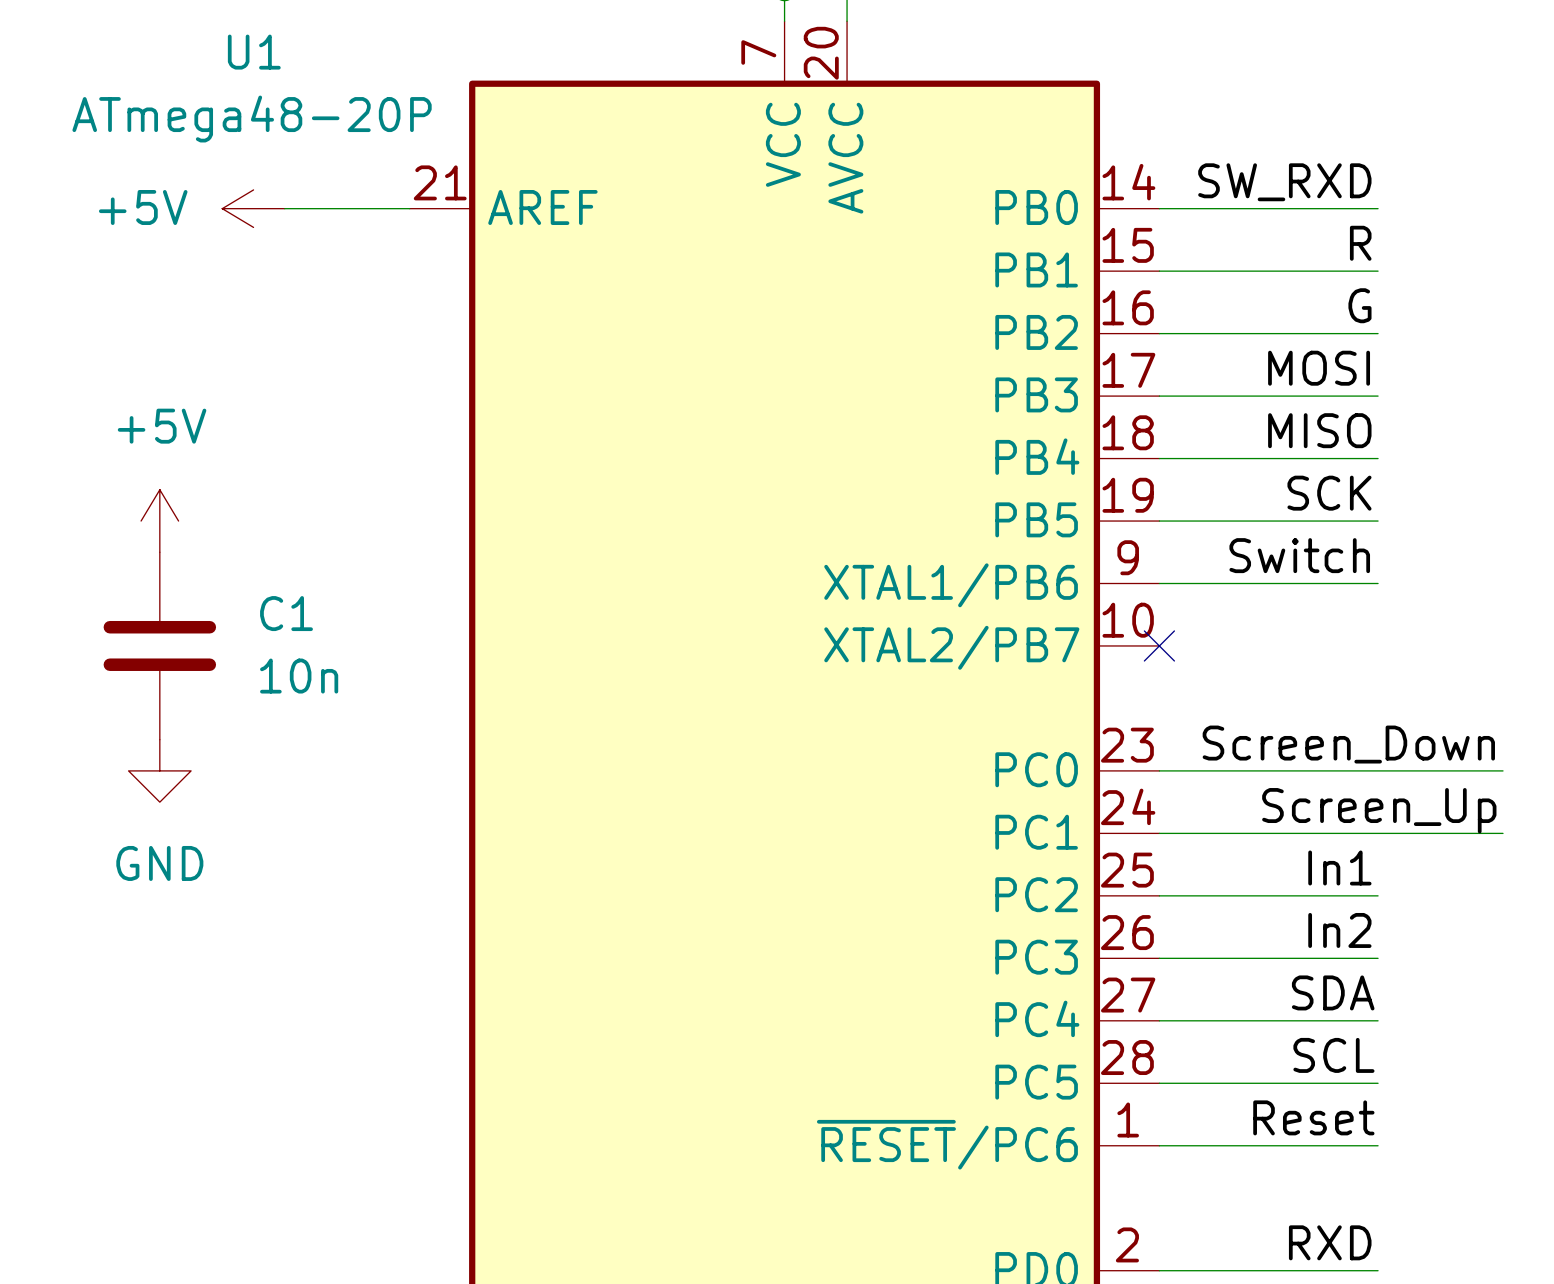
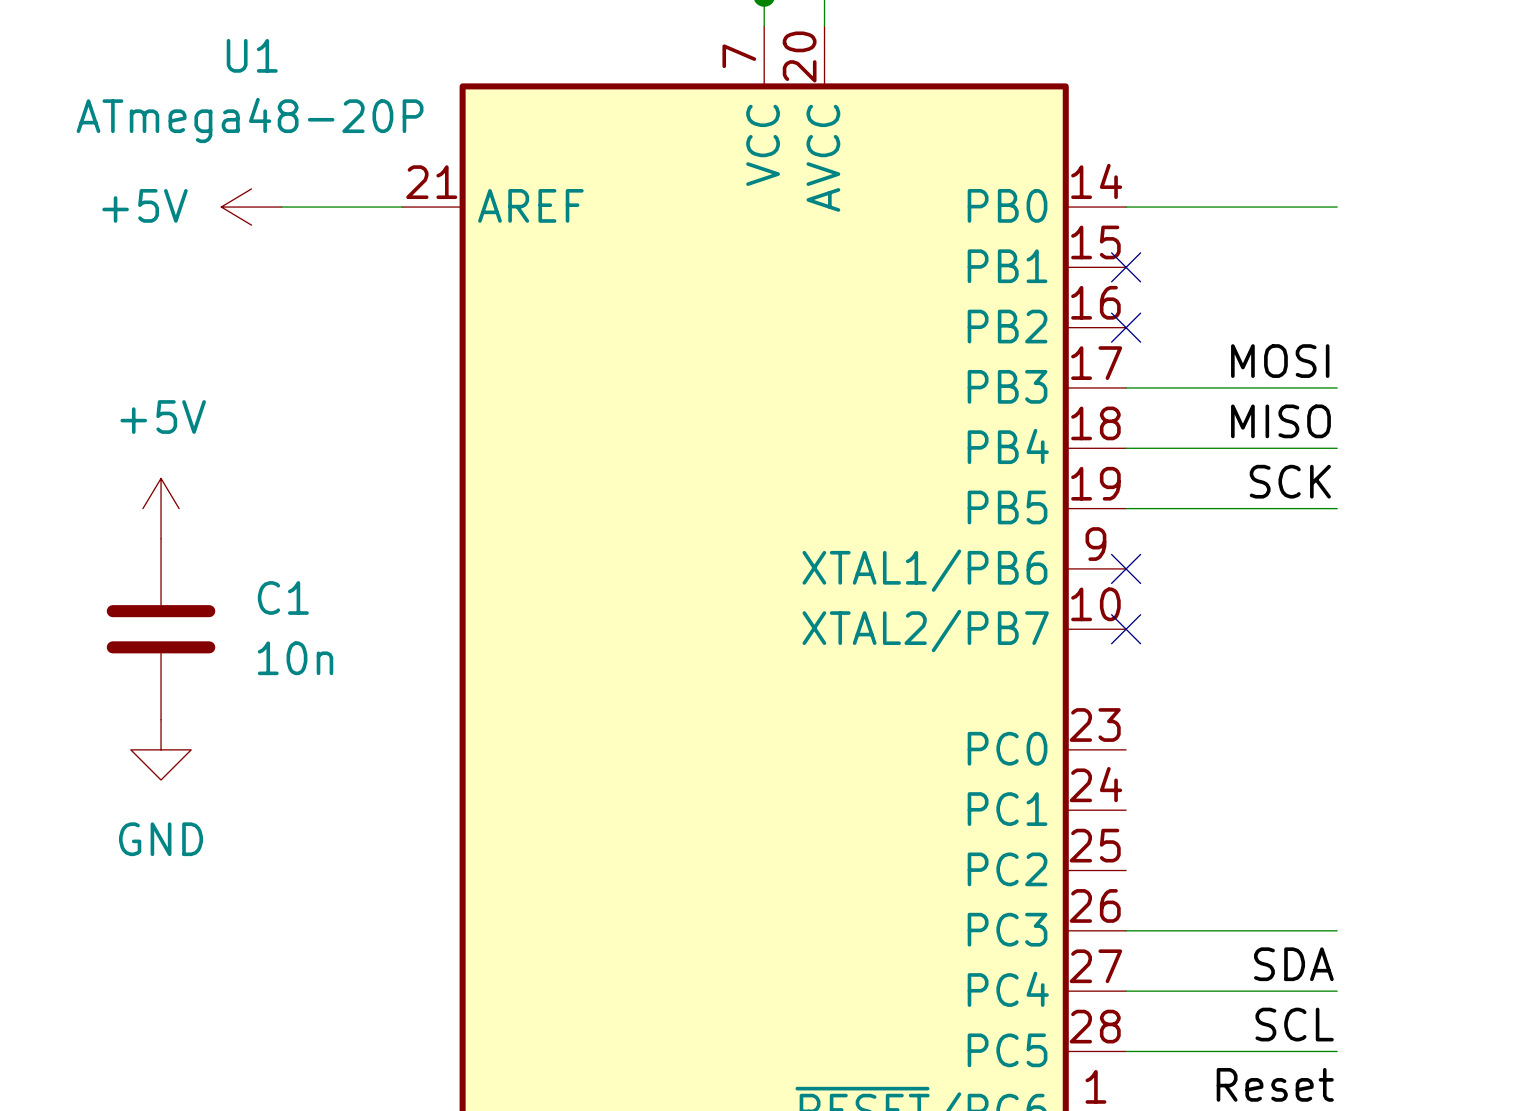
label: SW_RXD (1284, 182) -> none
label: R (1360, 243) -> none
wire: (1159, 271) (1378, 271) -> none
no-connect mark: none -> (1126, 267)
label: G (1359, 305) -> none
wire: (1159, 333) (1378, 333) -> none
no-connect mark: none -> (1126, 327)
label: Switch (1299, 555) -> none
wire: (1159, 583) (1378, 583) -> none
no-connect mark: none -> (1126, 568)
label: Screen_Down (1348, 744) -> none
wire: (1159, 770) (1503, 770) -> none
label: Screen_Up (1379, 810) -> none
wire: (1159, 833) (1503, 833) -> none
label: In1 (1339, 867) -> none
wire: (1159, 895) (1378, 895) -> none
label: In2 (1339, 930) -> none

